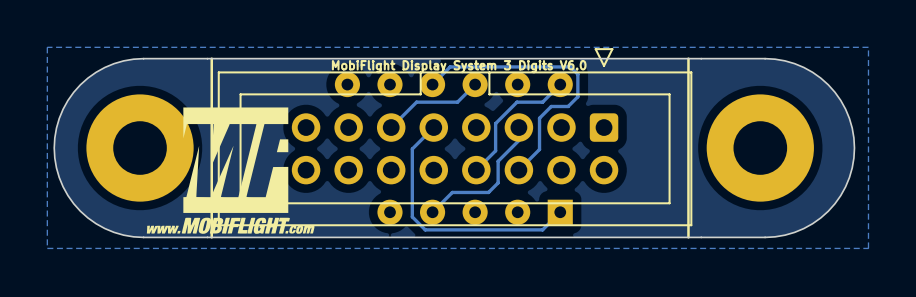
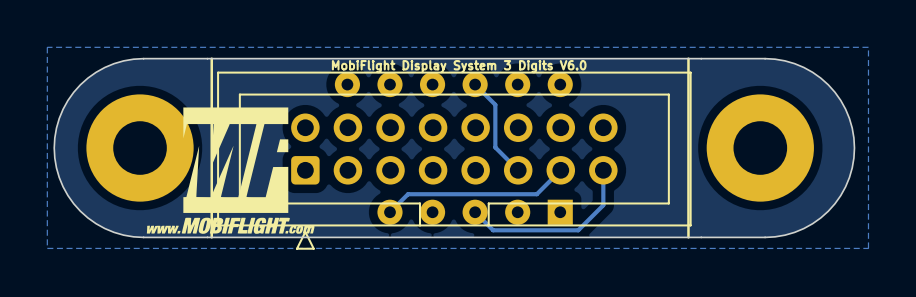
track: (432, 84) (450, 66) (570, 66) (577, 74) (577, 96) (568, 106) (551, 106) (539, 118) (539, 149) (518, 170) -> none
track: (475, 84) (457, 102) (416, 102) (391, 127) -> (475, 84) (495, 104) (495, 147) (518, 170)
track: (560, 84) (542, 102) (517, 102) (495, 123) (495, 150) (476, 170) -> none
track: (433, 127) (412, 148) (412, 216) (425, 229) (542, 229) (560, 212) -> none
track: (518, 127) (518, 140) (498, 161) (498, 182) (488, 192) (452, 192) (432, 212) -> none
part rotation: 0° (455, 137) -> 180° (454, 160)
track: none -> (560, 170) (536, 194) (408, 194) (389, 212)
track: none -> (603, 170) (603, 205) (578, 230) (493, 230) (475, 212)

